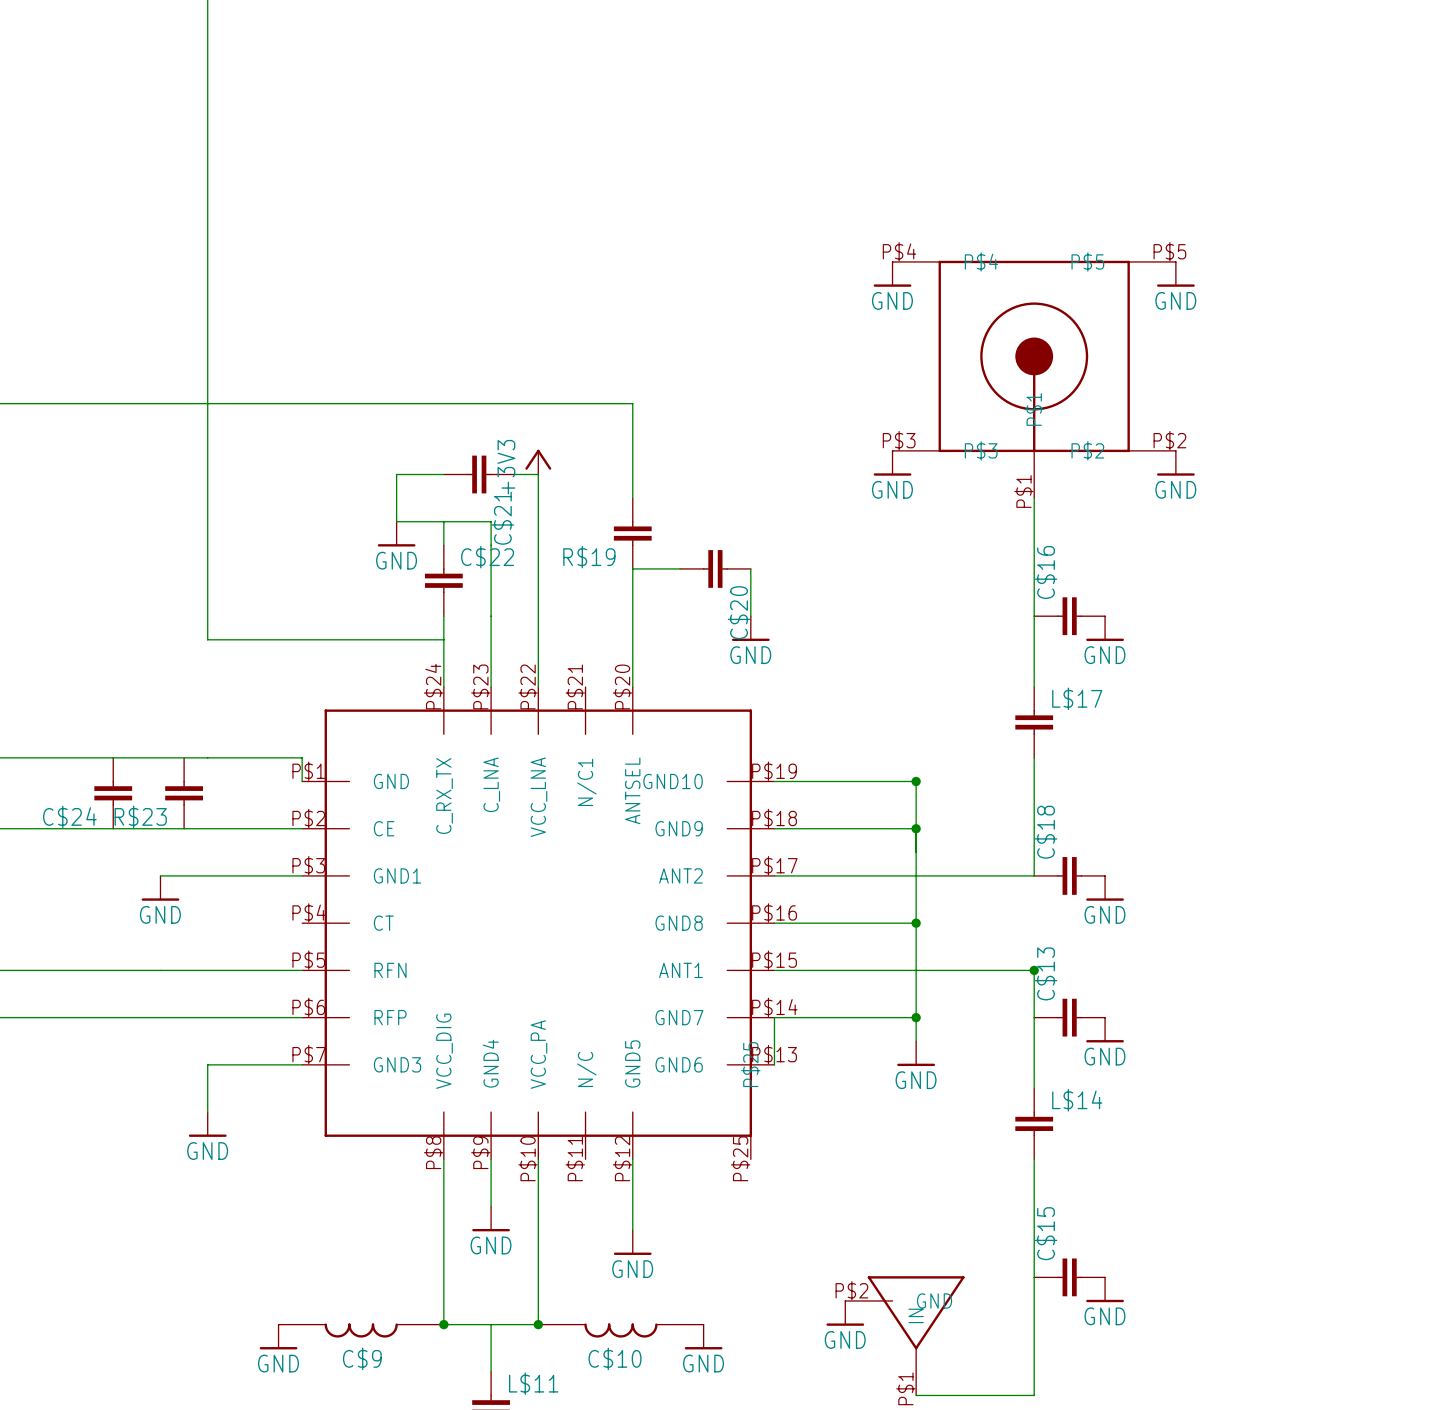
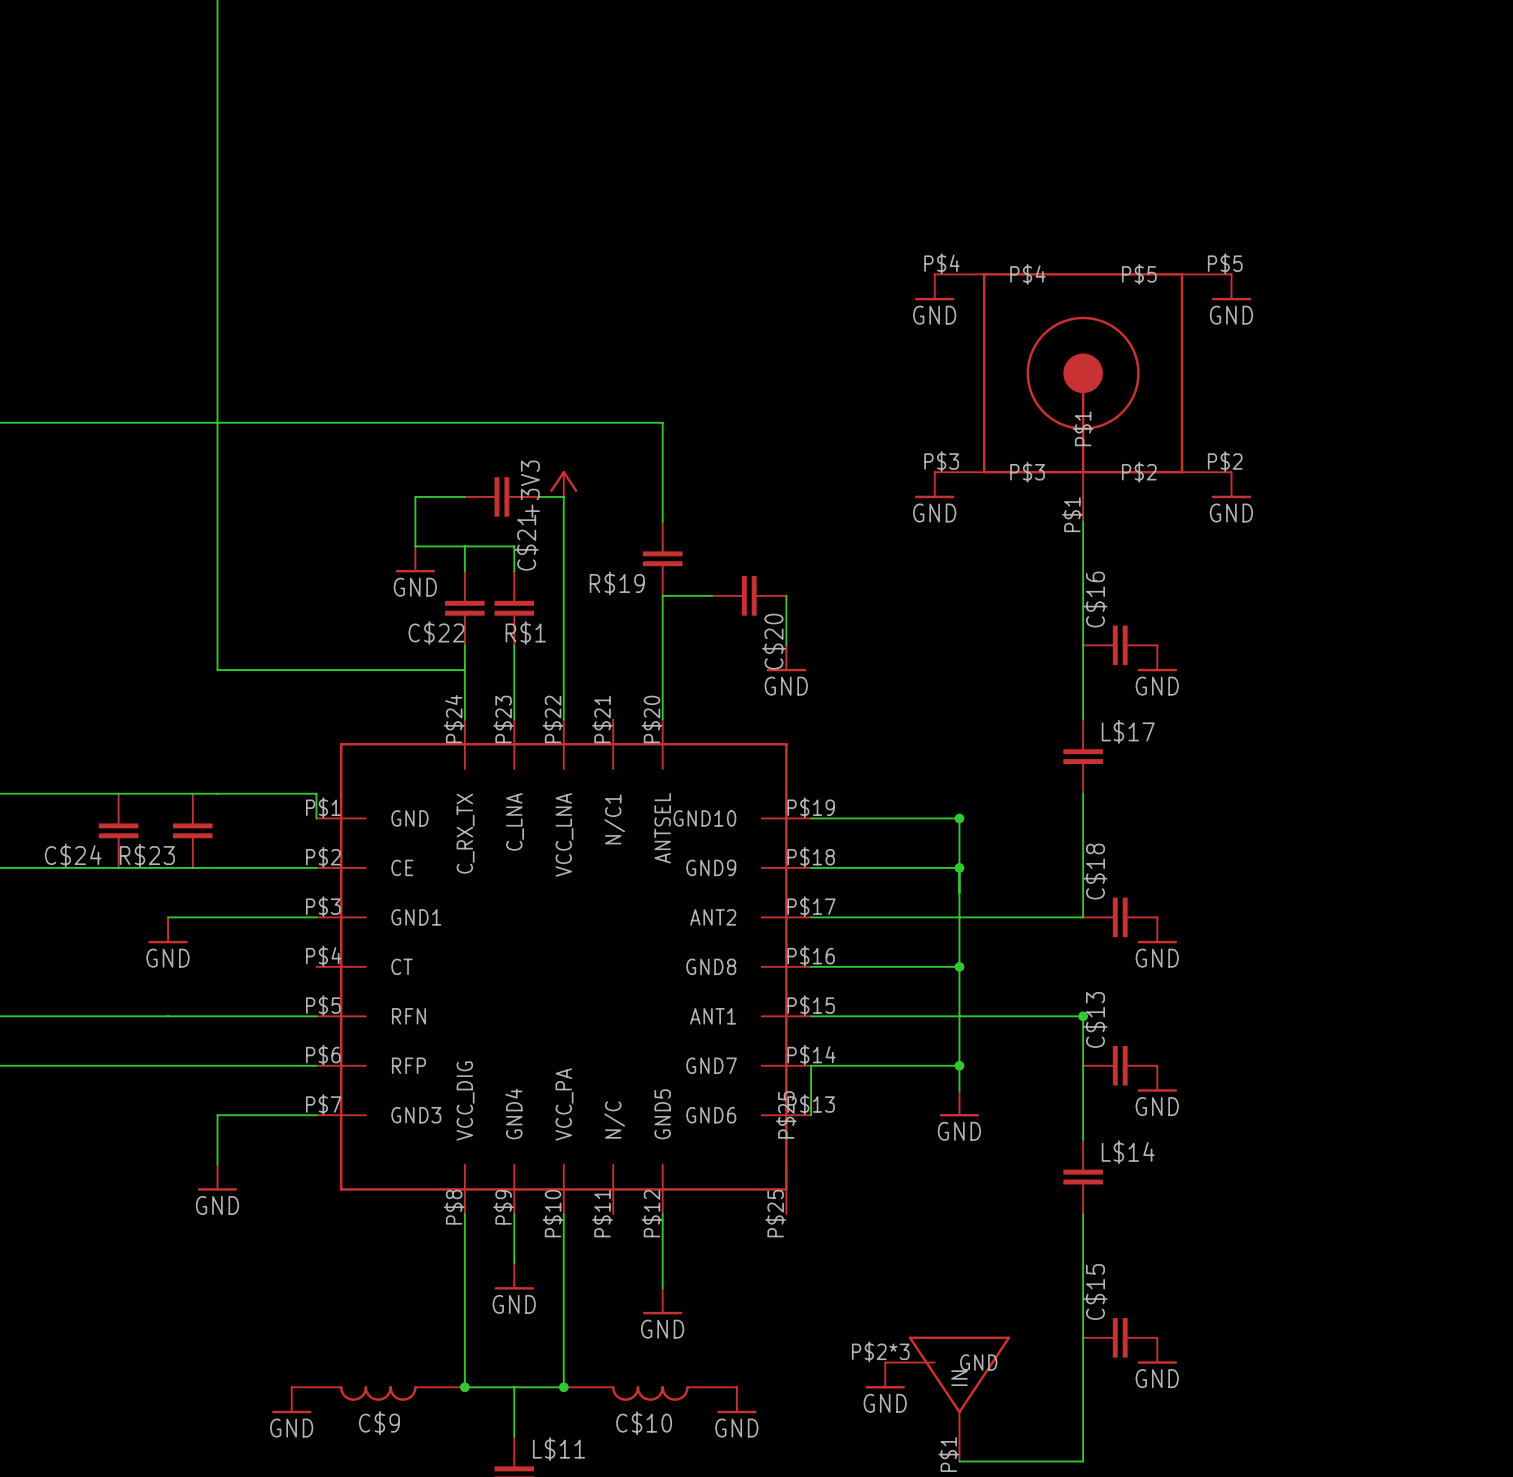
C$22 name position: C$22 (487, 557) -> C$22 (436, 632)
R$1: none -> (514, 608)
part pin number: P$2 (851, 1290) -> P$2*3 (880, 1351)

